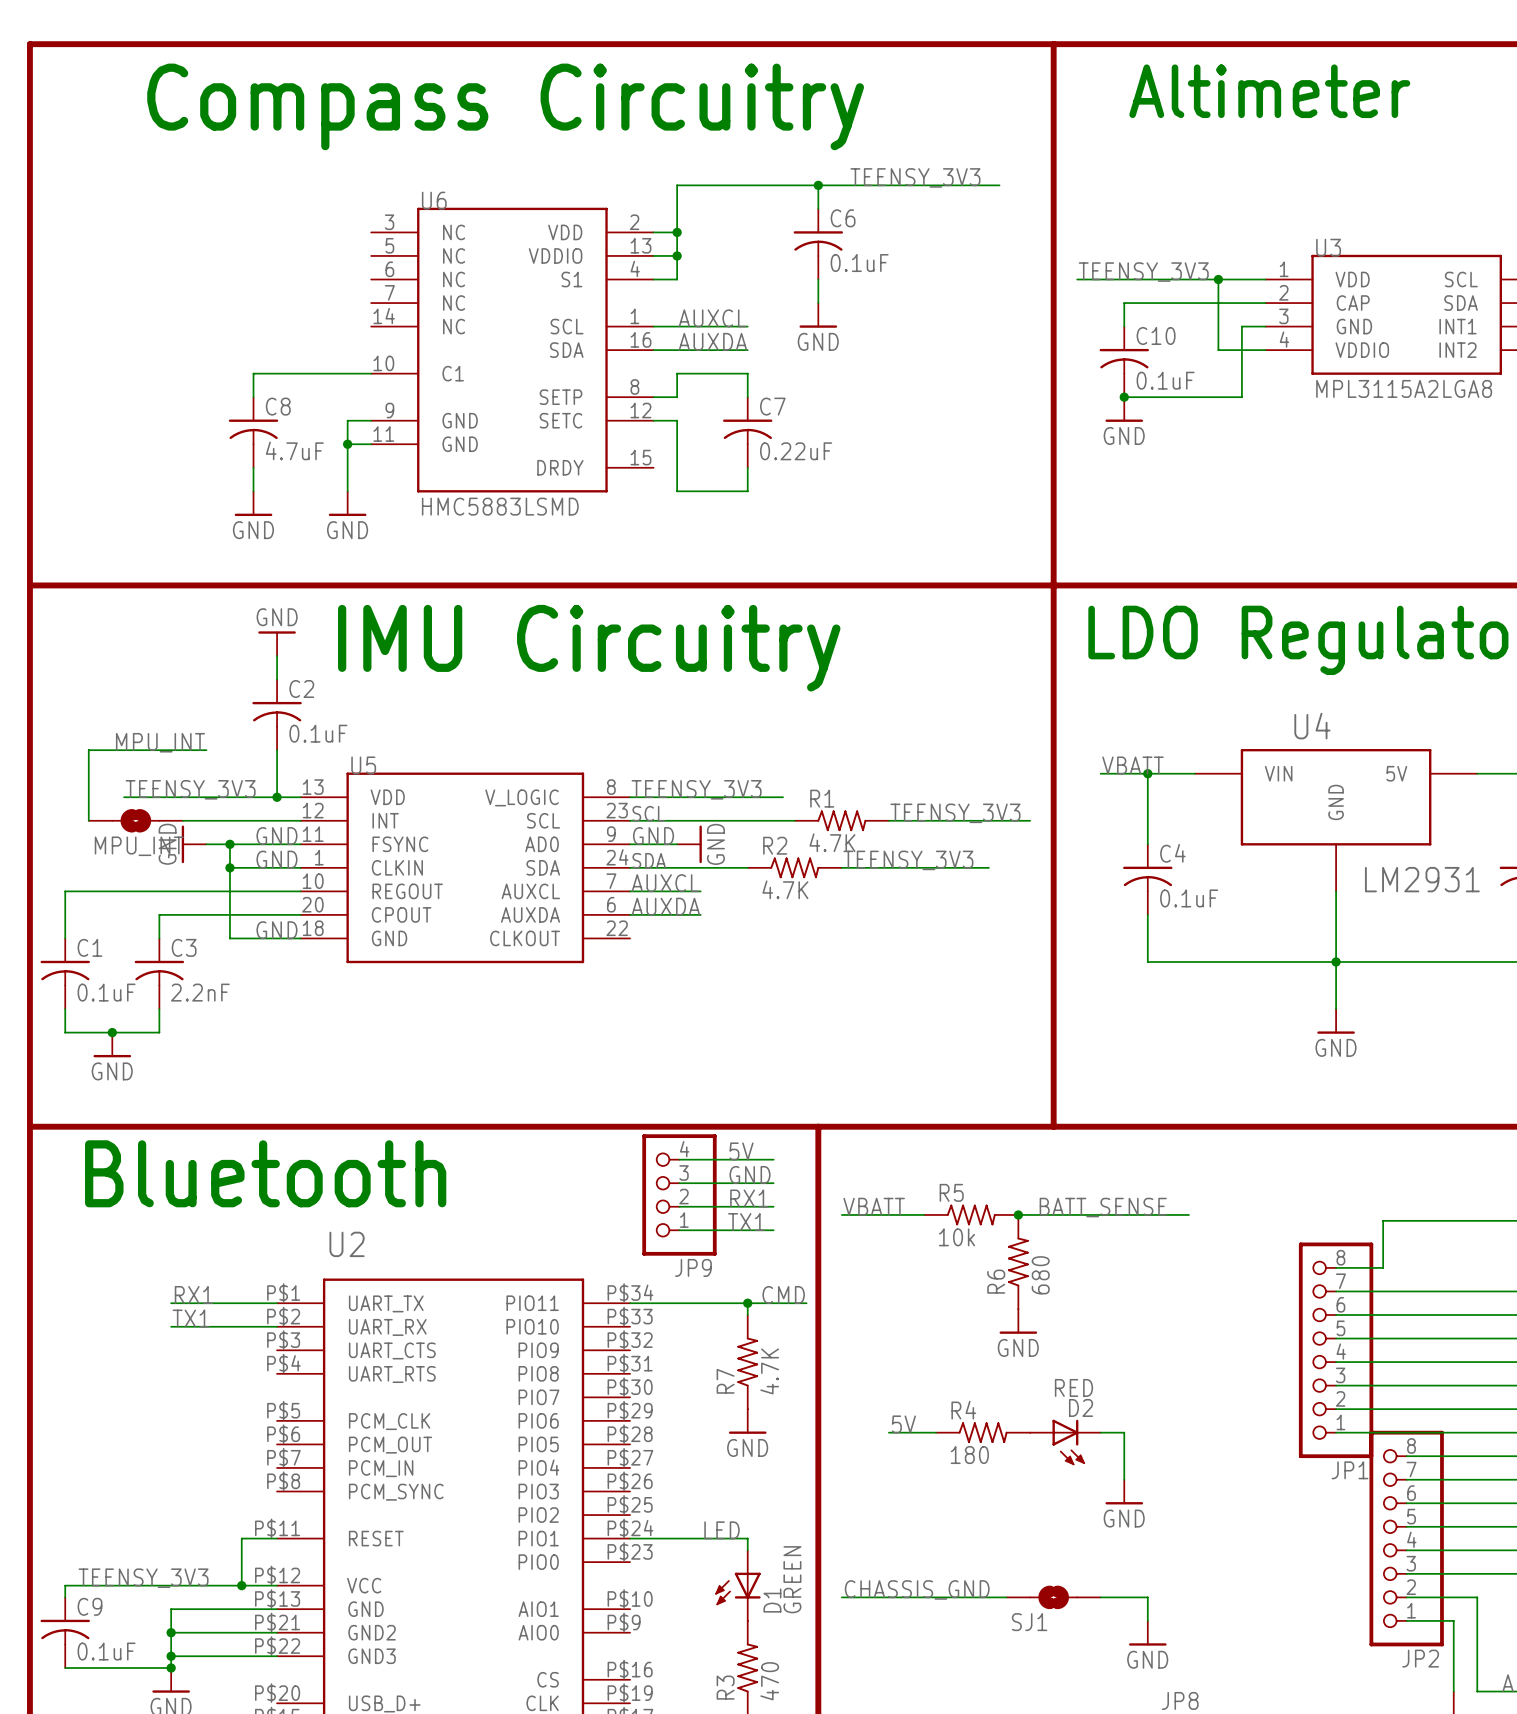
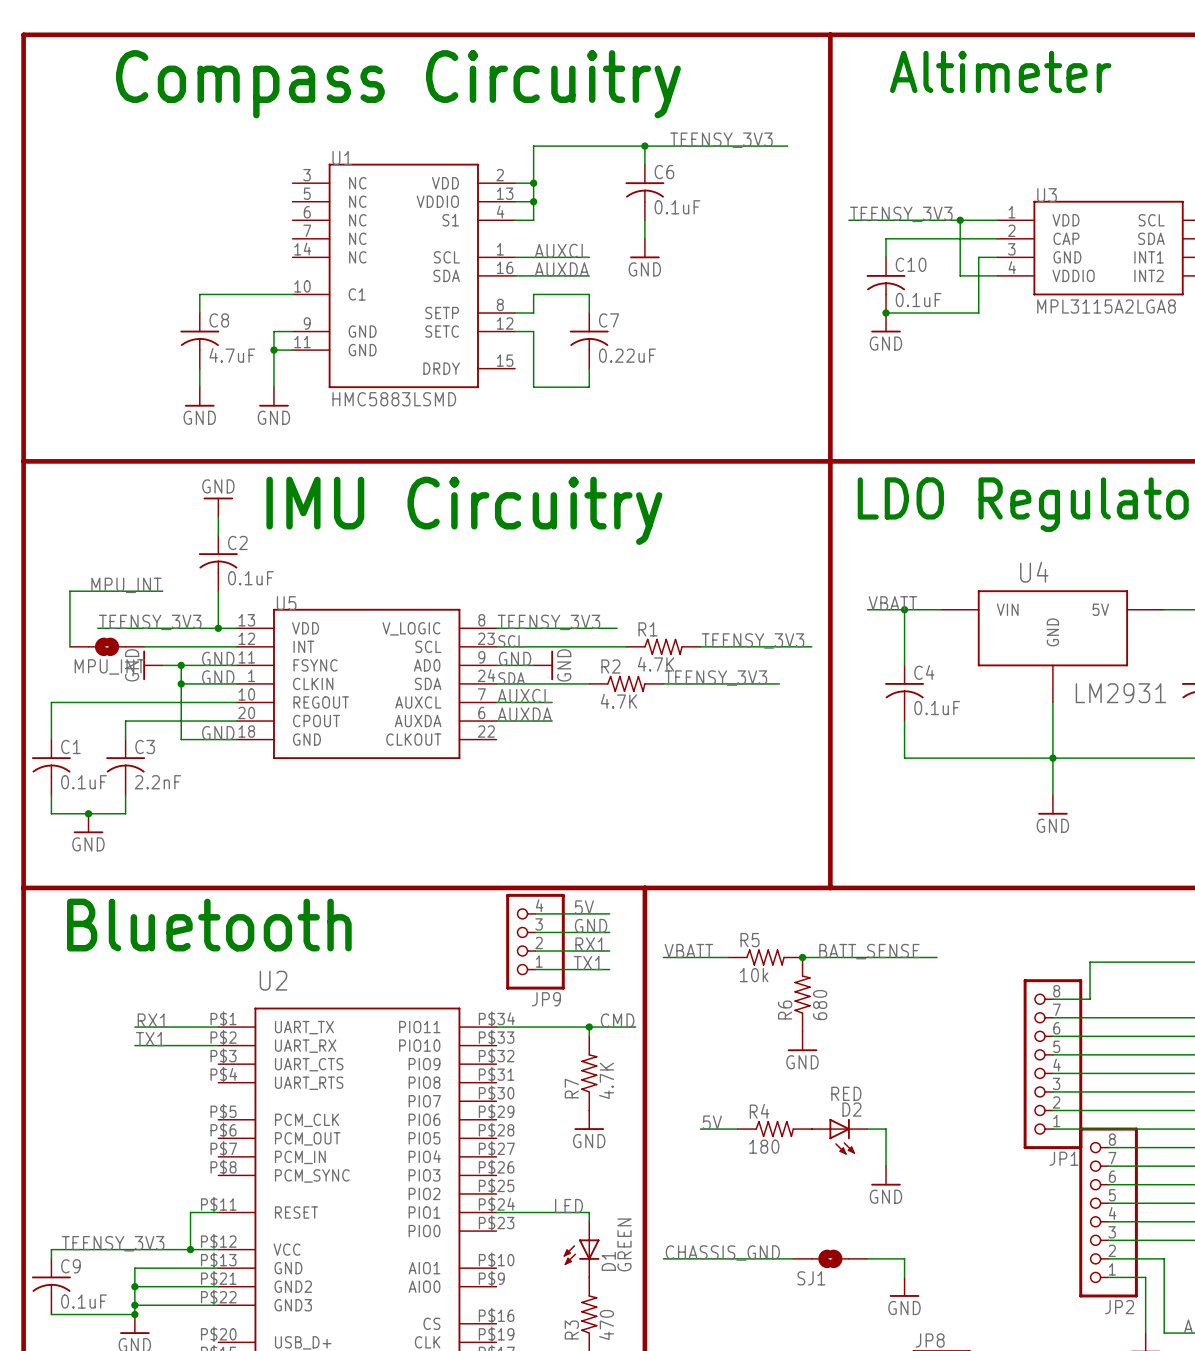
U6 name: U6 (434, 200) -> U1 (342, 158)

